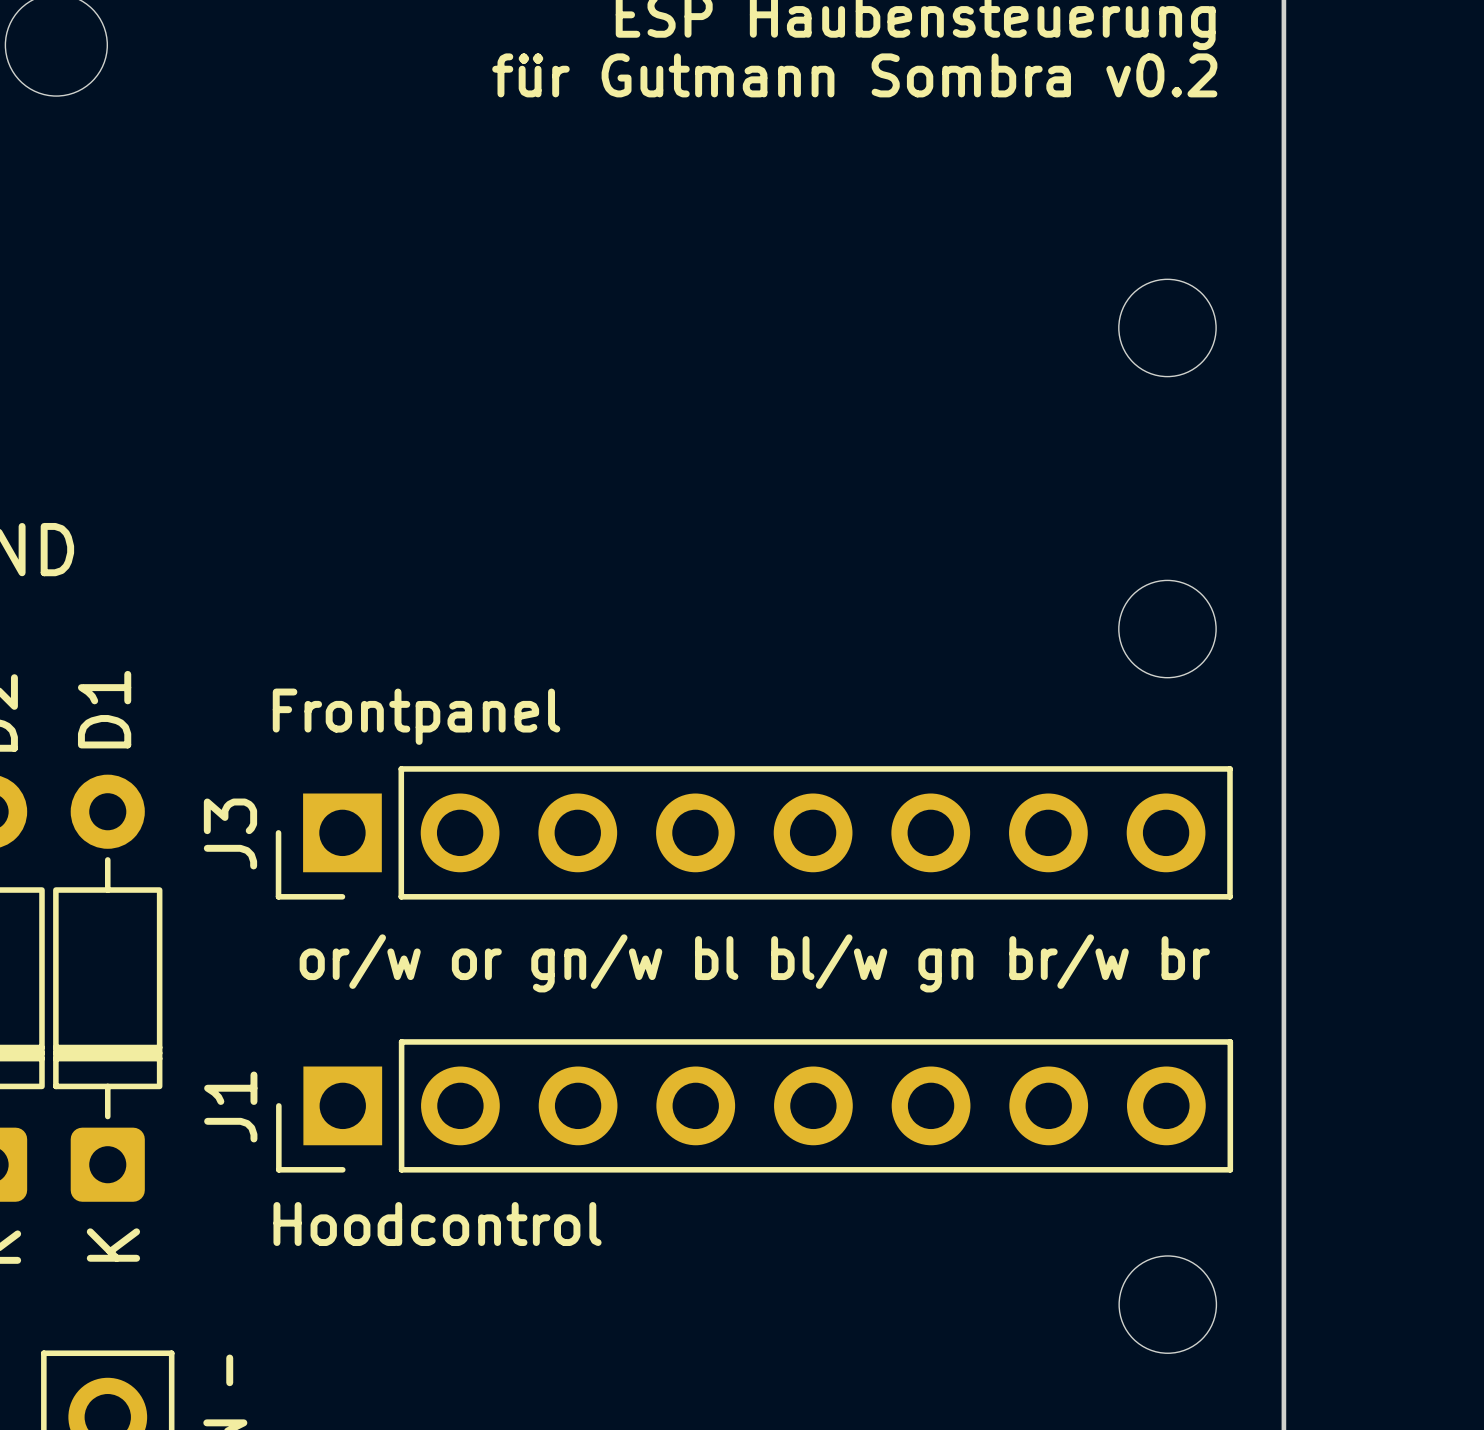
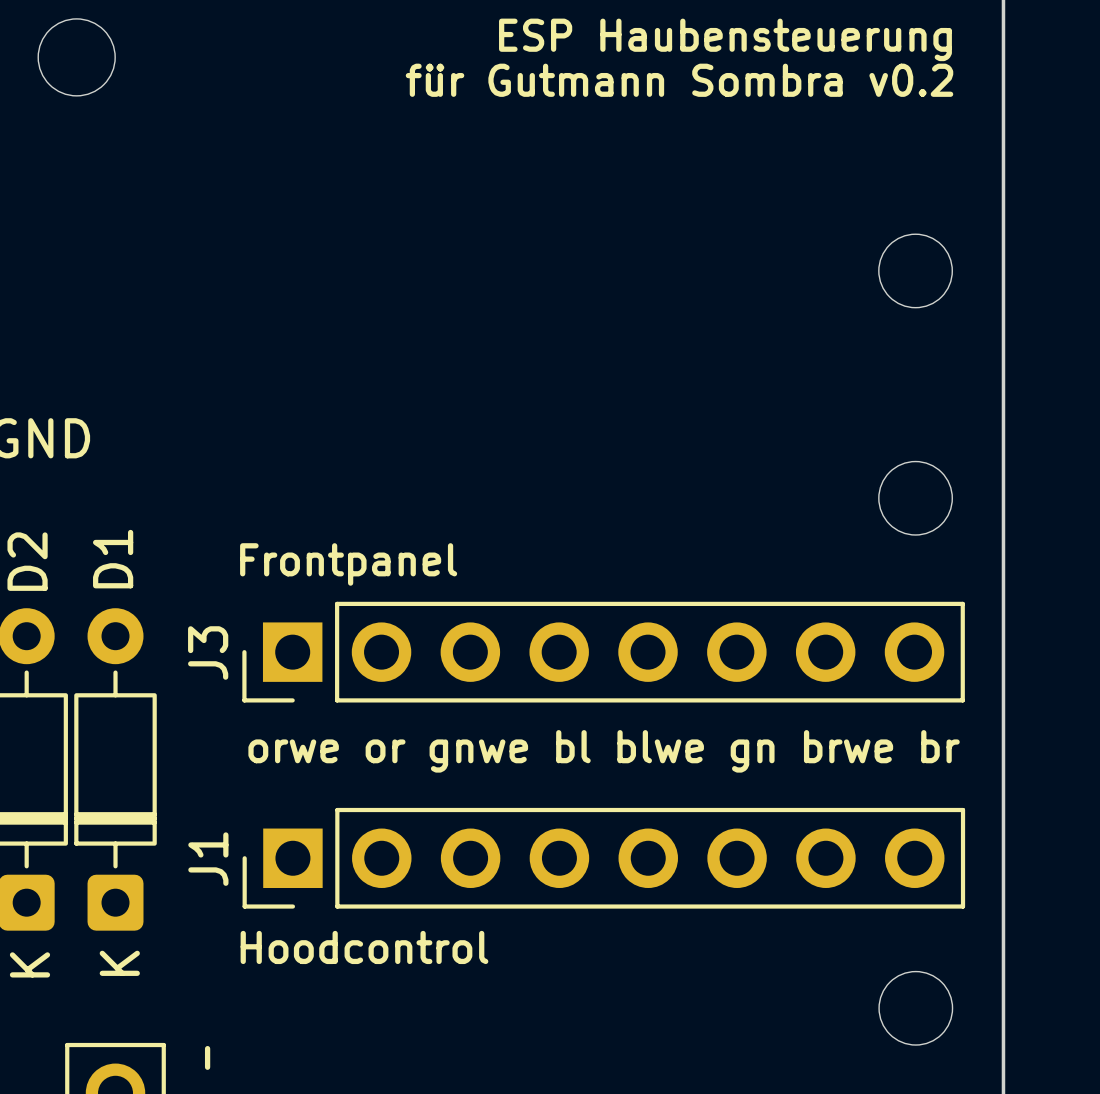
text: or/w or gn/w bl bl/w gn br/w br (754, 963) -> orwe or gnwe bl blwe gn brwe br (604, 751)

